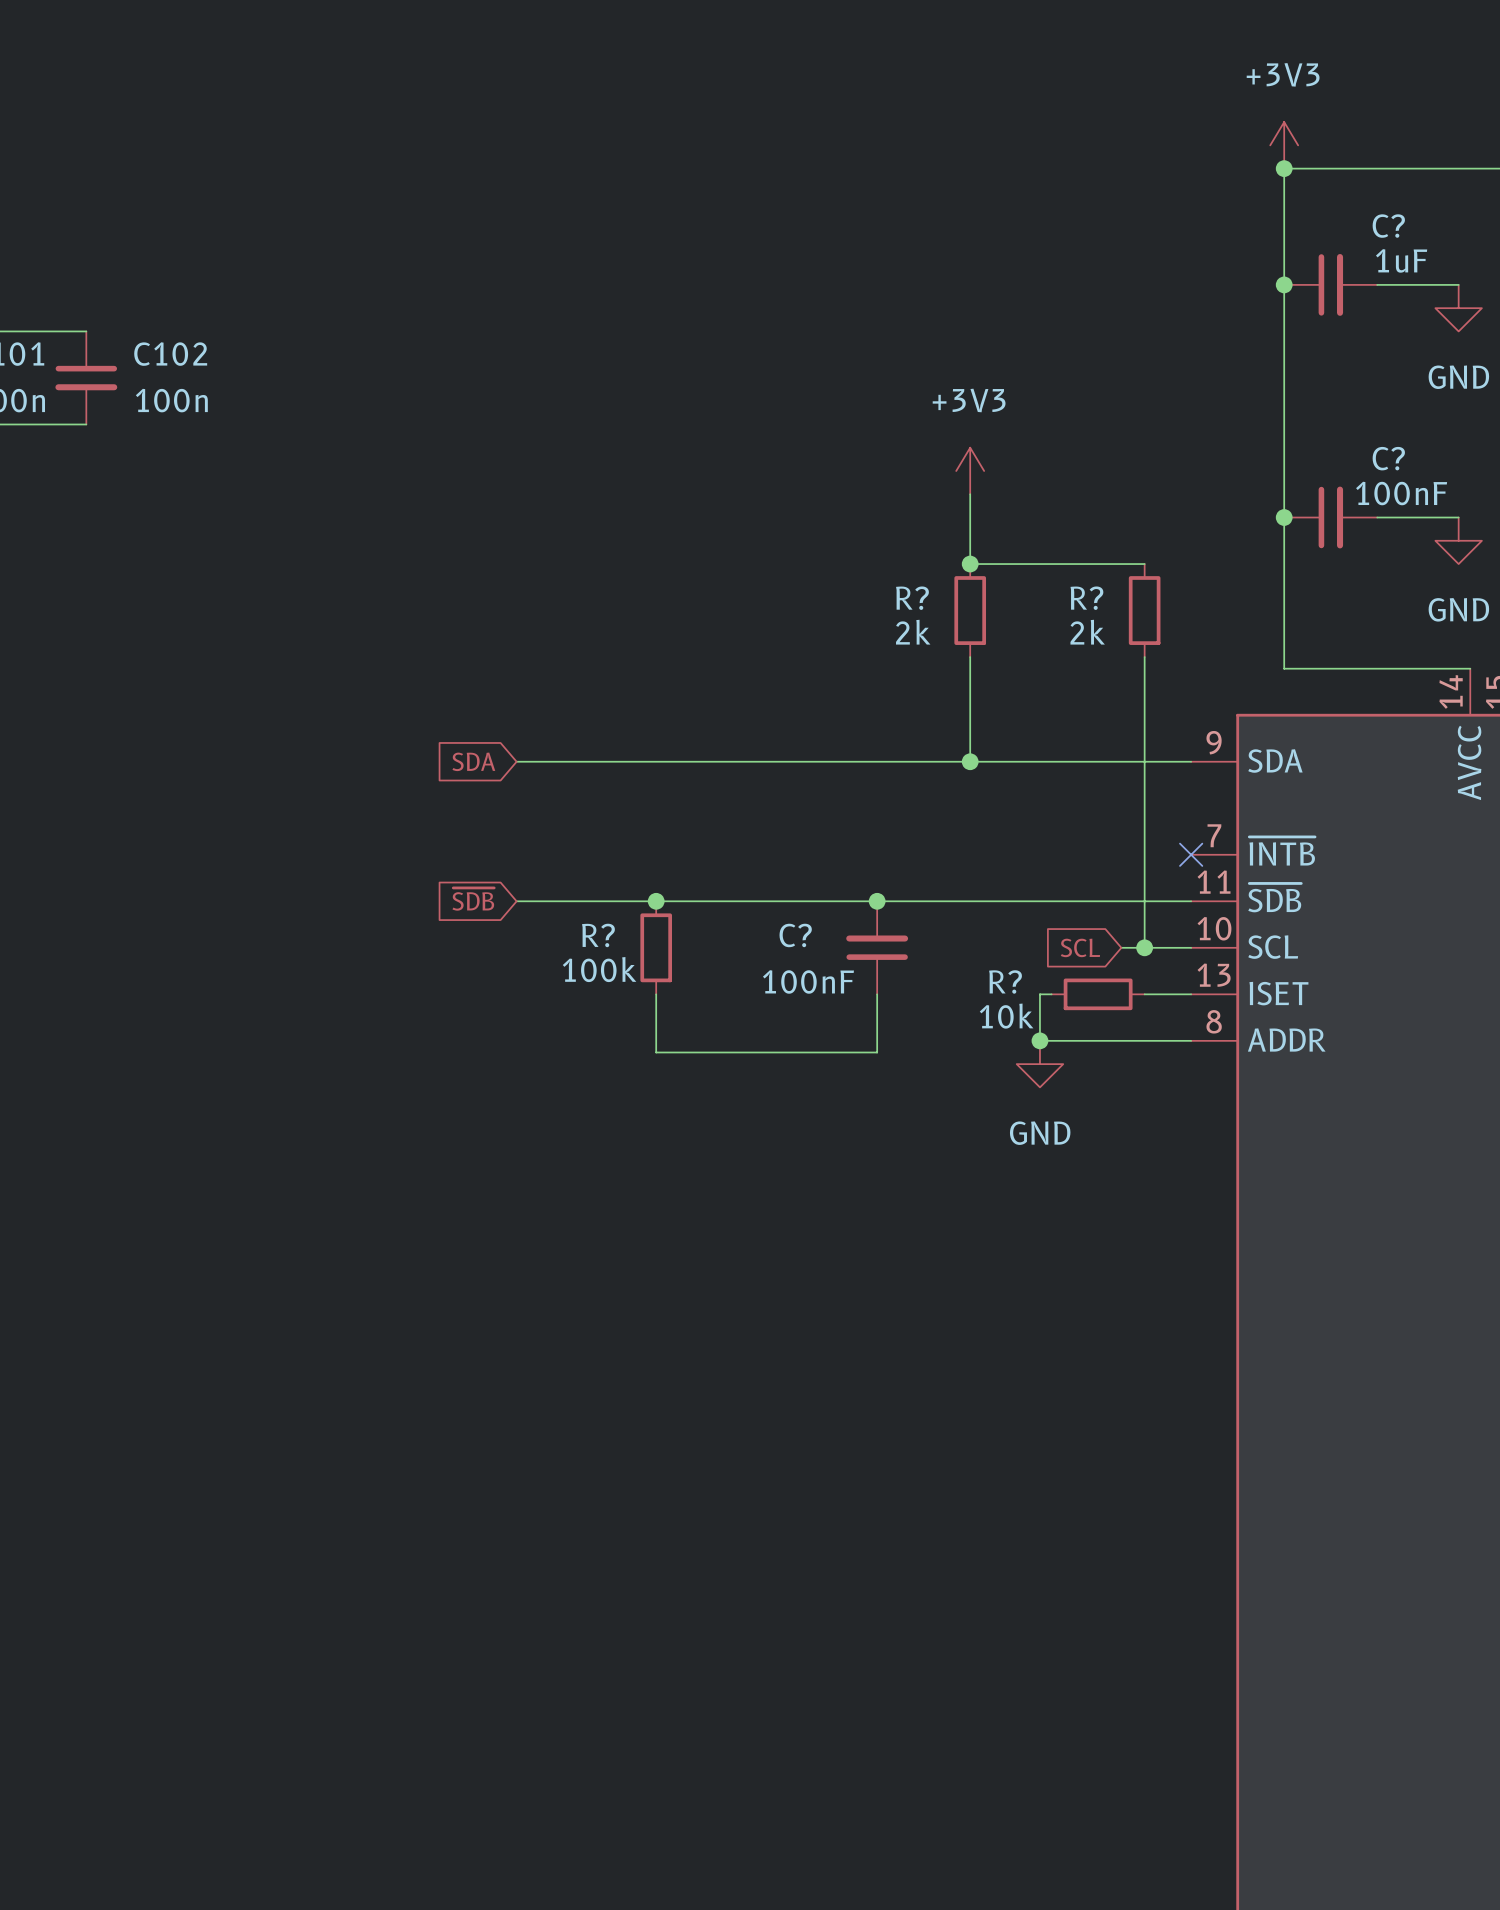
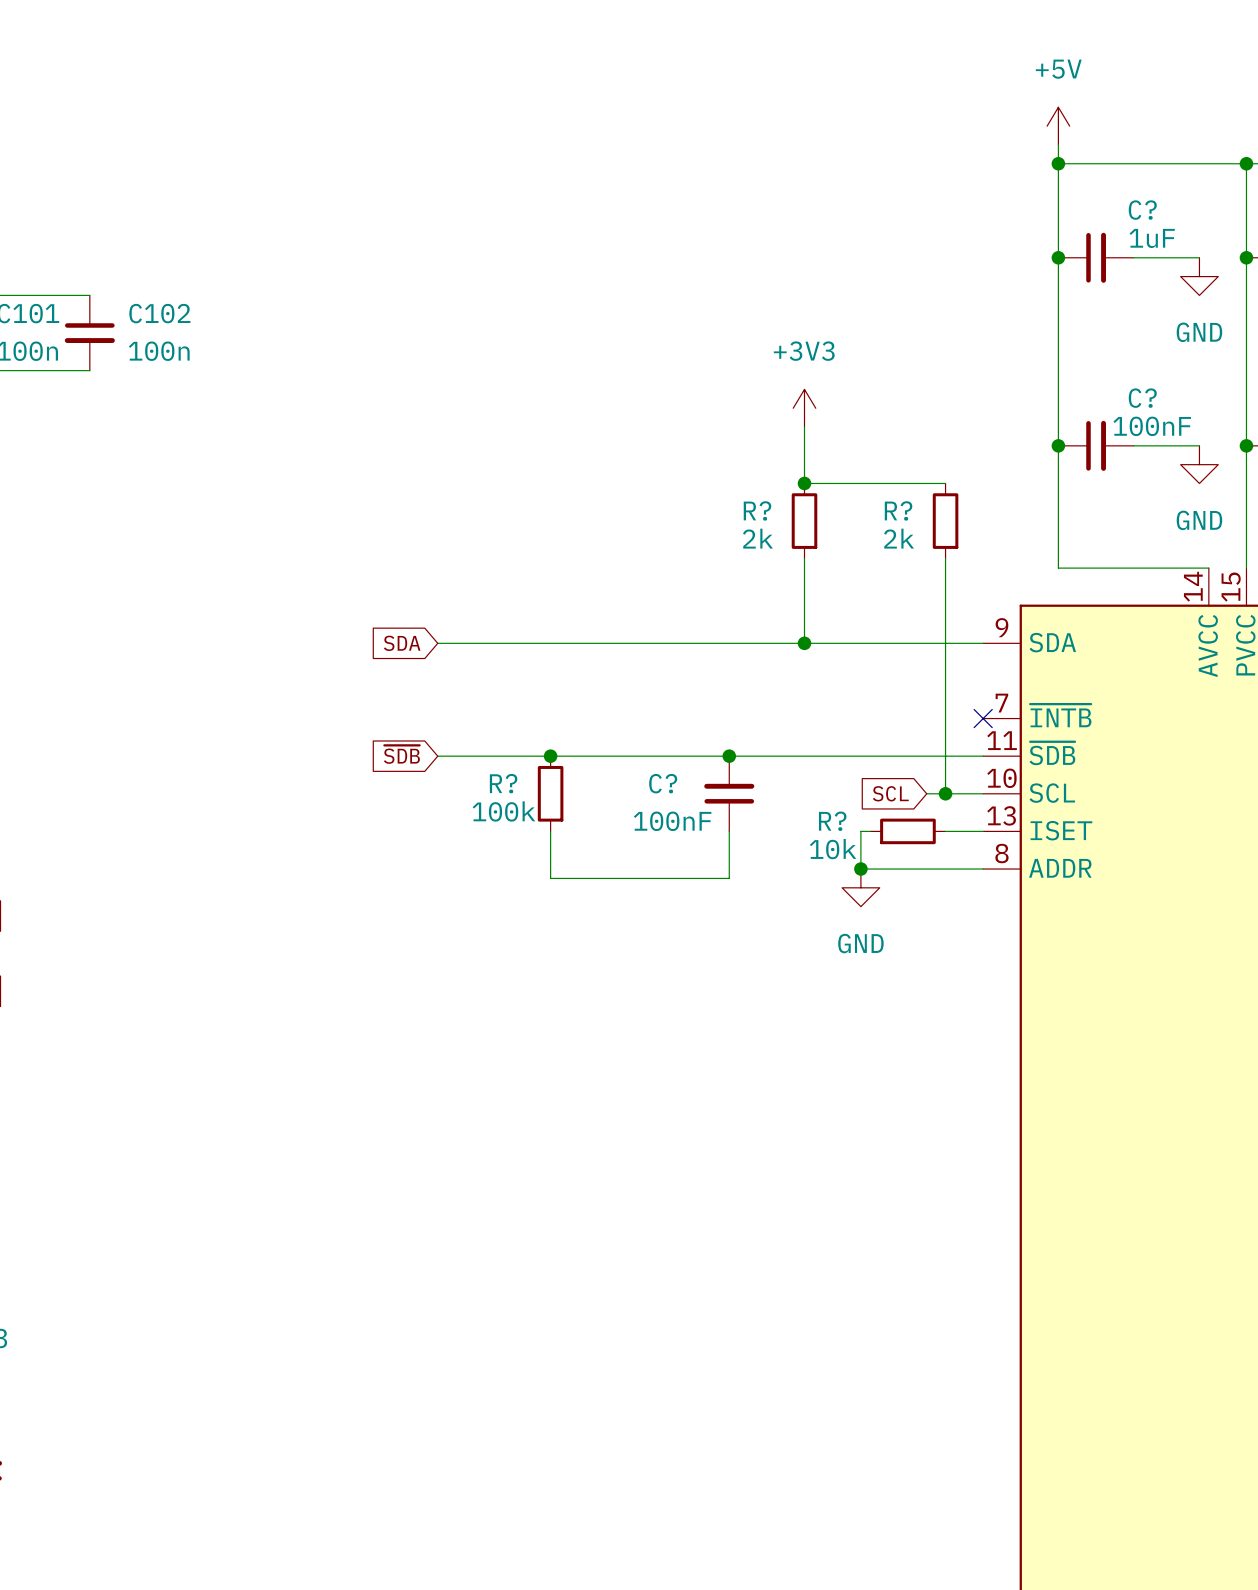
power symbol: none -> +5V (1058, 126)
power symbol: +3V3 (1284, 145) -> none

